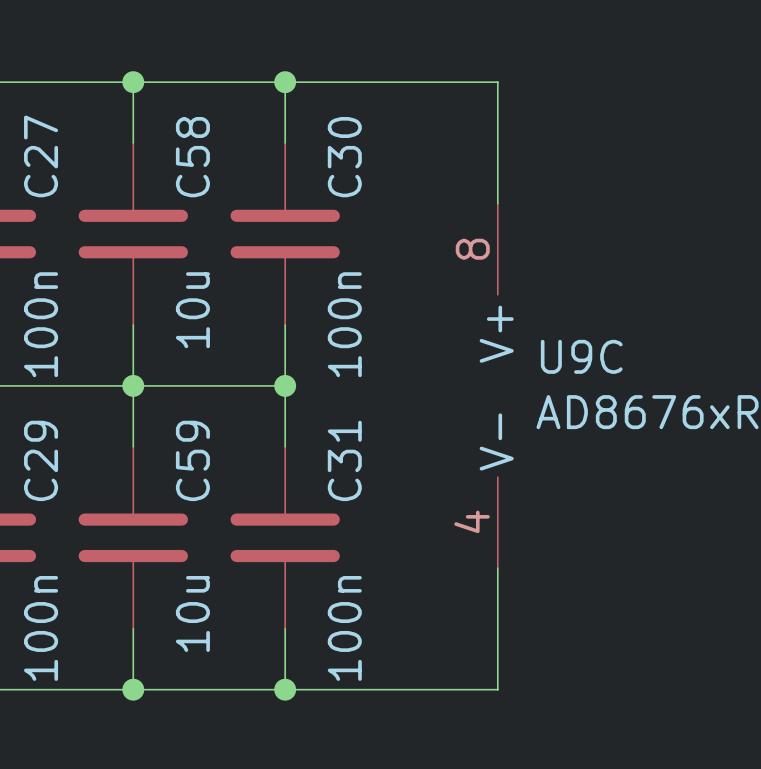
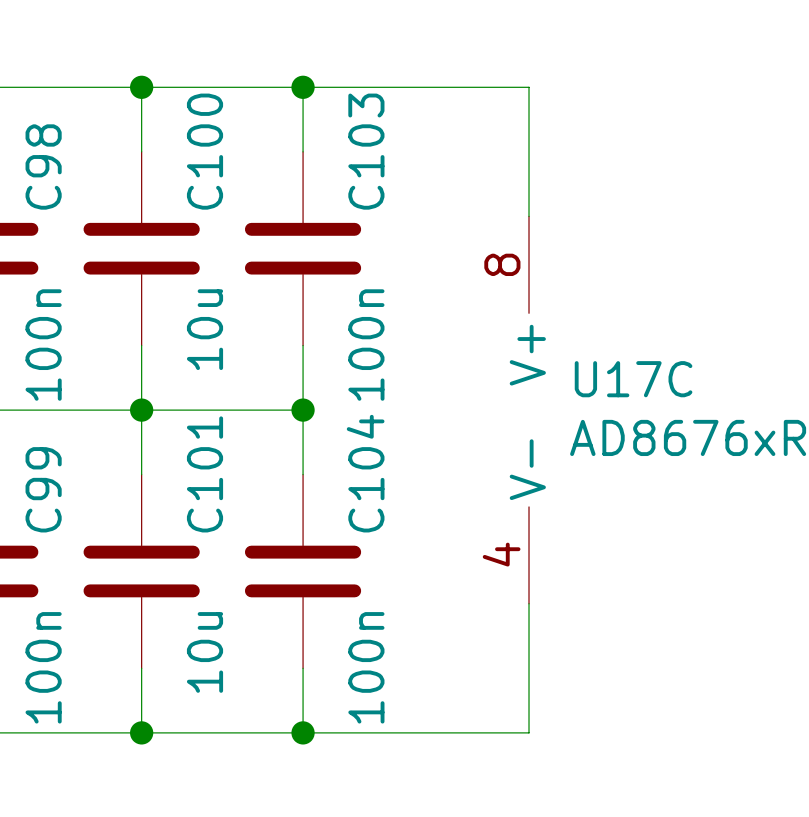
C27 name: C27 (41, 156) -> C98 (43, 166)
C58 name: C58 (192, 157) -> C100 (205, 151)
C30 name: C30 (344, 157) -> C103 (366, 151)
U9C name: U9C (581, 356) -> U17C (633, 379)
C29 name: C29 (41, 460) -> C99 (43, 489)
C59 name: C59 (192, 460) -> C101 (205, 474)
C31 name: C31 (344, 460) -> C104 (365, 473)

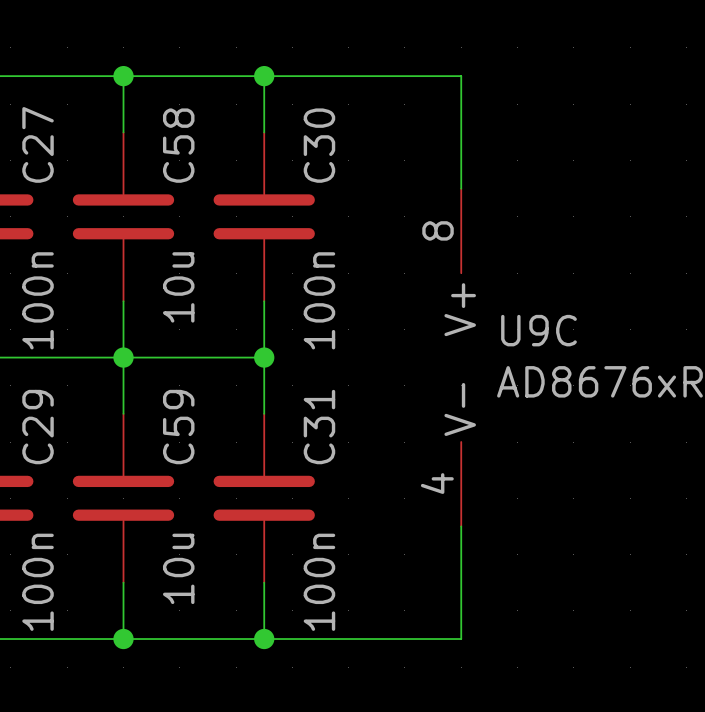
C100 name: C100 (205, 151) -> C58 (178, 145)
C103 name: C103 (366, 151) -> C30 (319, 145)
C98 name: C98 (43, 166) -> C27 (38, 144)
U17C name: U17C (633, 379) -> U9C (538, 330)
C104 name: C104 (365, 473) -> C31 (319, 427)
C101 name: C101 (205, 474) -> C59 (178, 427)
C99 name: C99 (43, 489) -> C29 (38, 427)

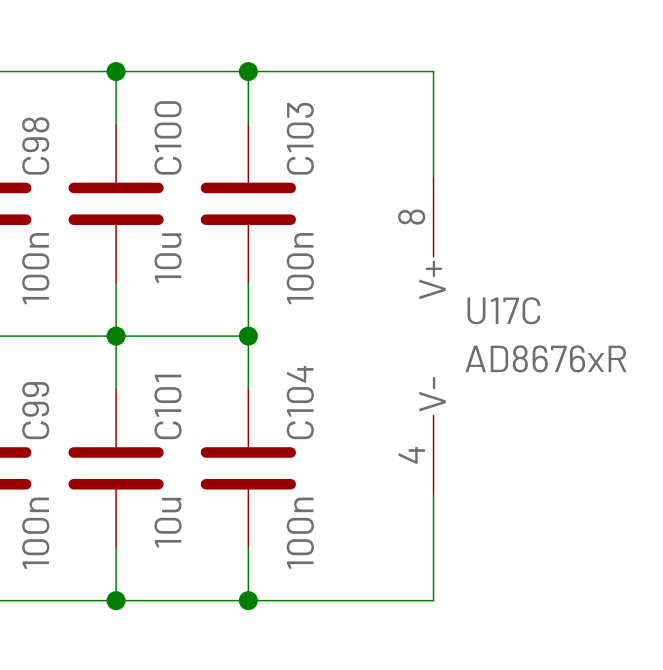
C27 name: C27 (38, 144) -> C98 (35, 146)
C58 name: C58 (178, 145) -> C100 (168, 137)
C30 name: C30 (319, 145) -> C103 (300, 138)
U9C name: U9C (538, 330) -> U17C (503, 310)
C29 name: C29 (38, 427) -> C99 (35, 410)
C59 name: C59 (178, 427) -> C101 (168, 406)
C31 name: C31 (319, 427) -> C104 (300, 402)

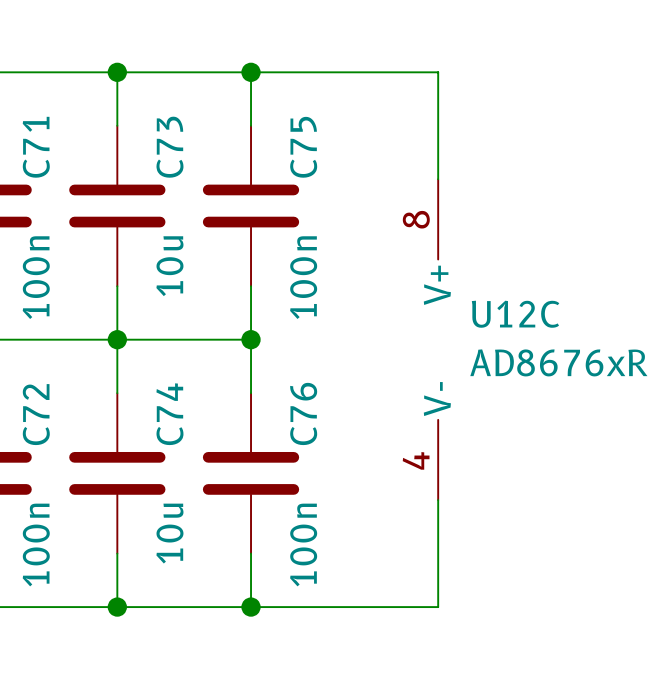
C100 name: C100 (168, 137) -> C73 (169, 147)
C103 name: C103 (300, 138) -> C75 (303, 147)
C98 name: C98 (35, 146) -> C71 (36, 147)
U17C name: U17C (503, 310) -> U12C (515, 314)
C104 name: C104 (300, 402) -> C76 (303, 413)
C101 name: C101 (168, 406) -> C74 (169, 414)
C99 name: C99 (35, 410) -> C72 (36, 414)

